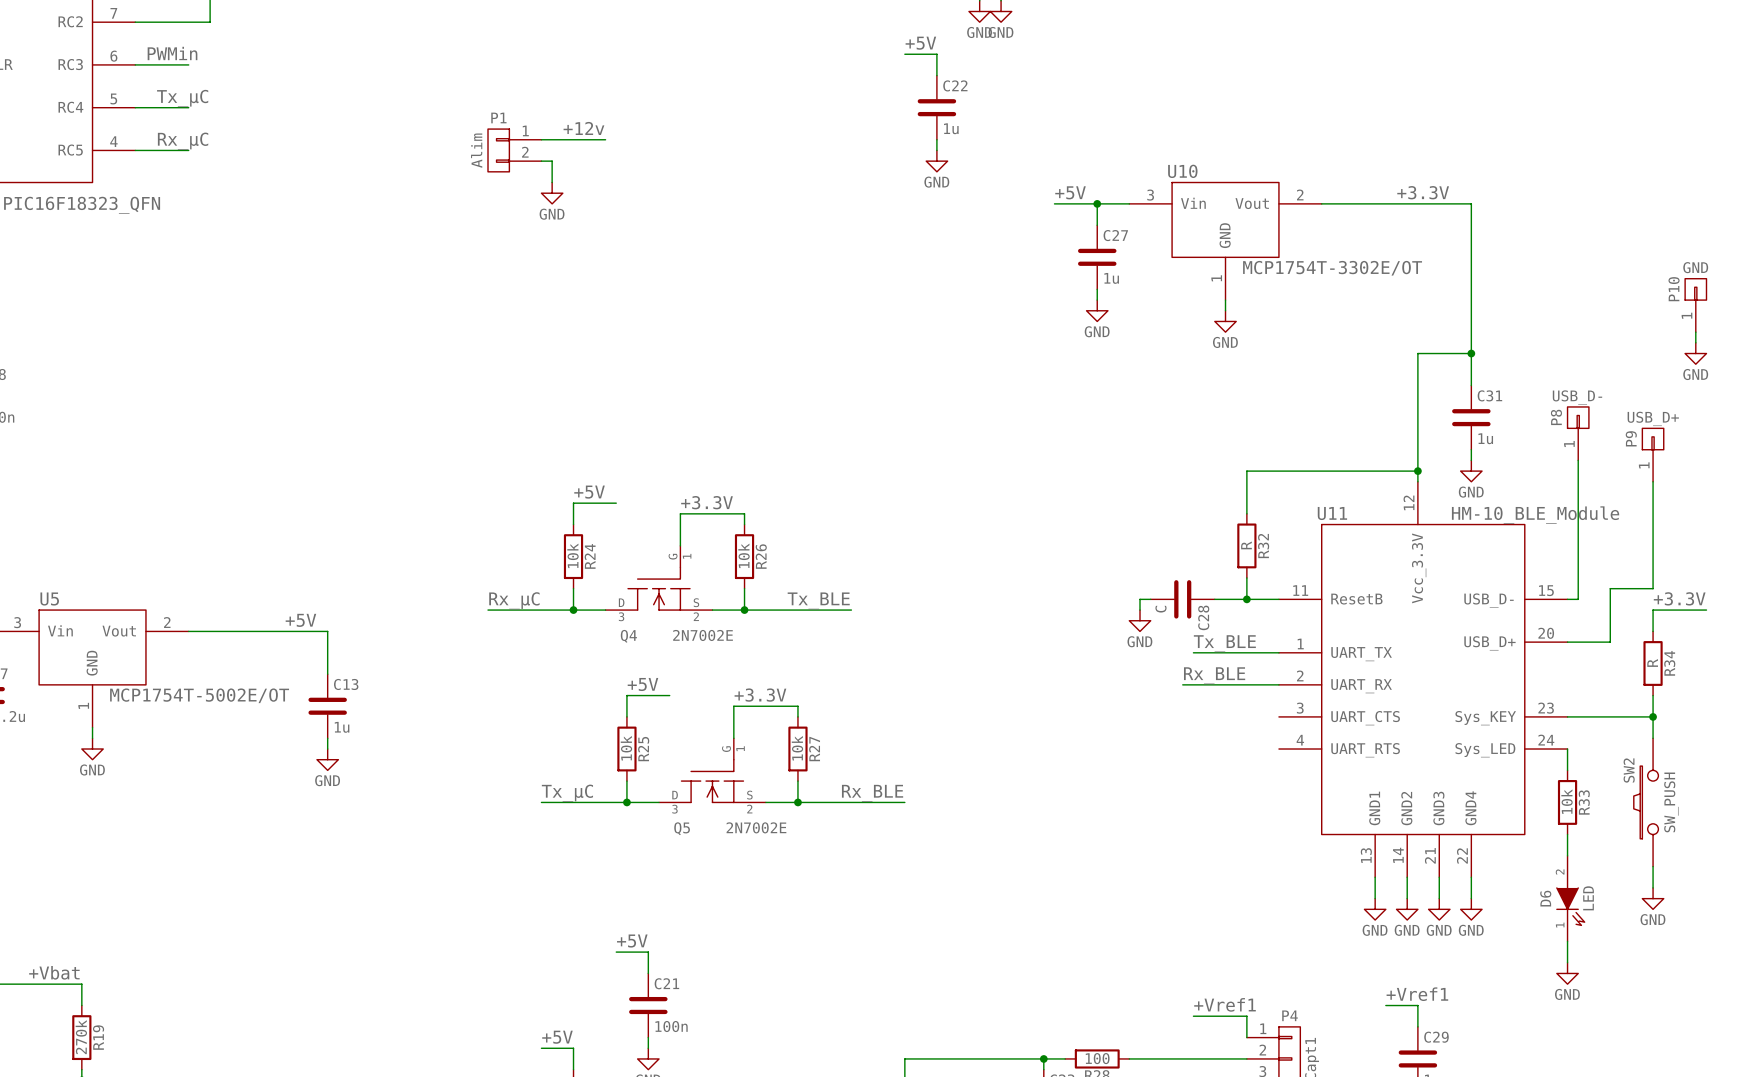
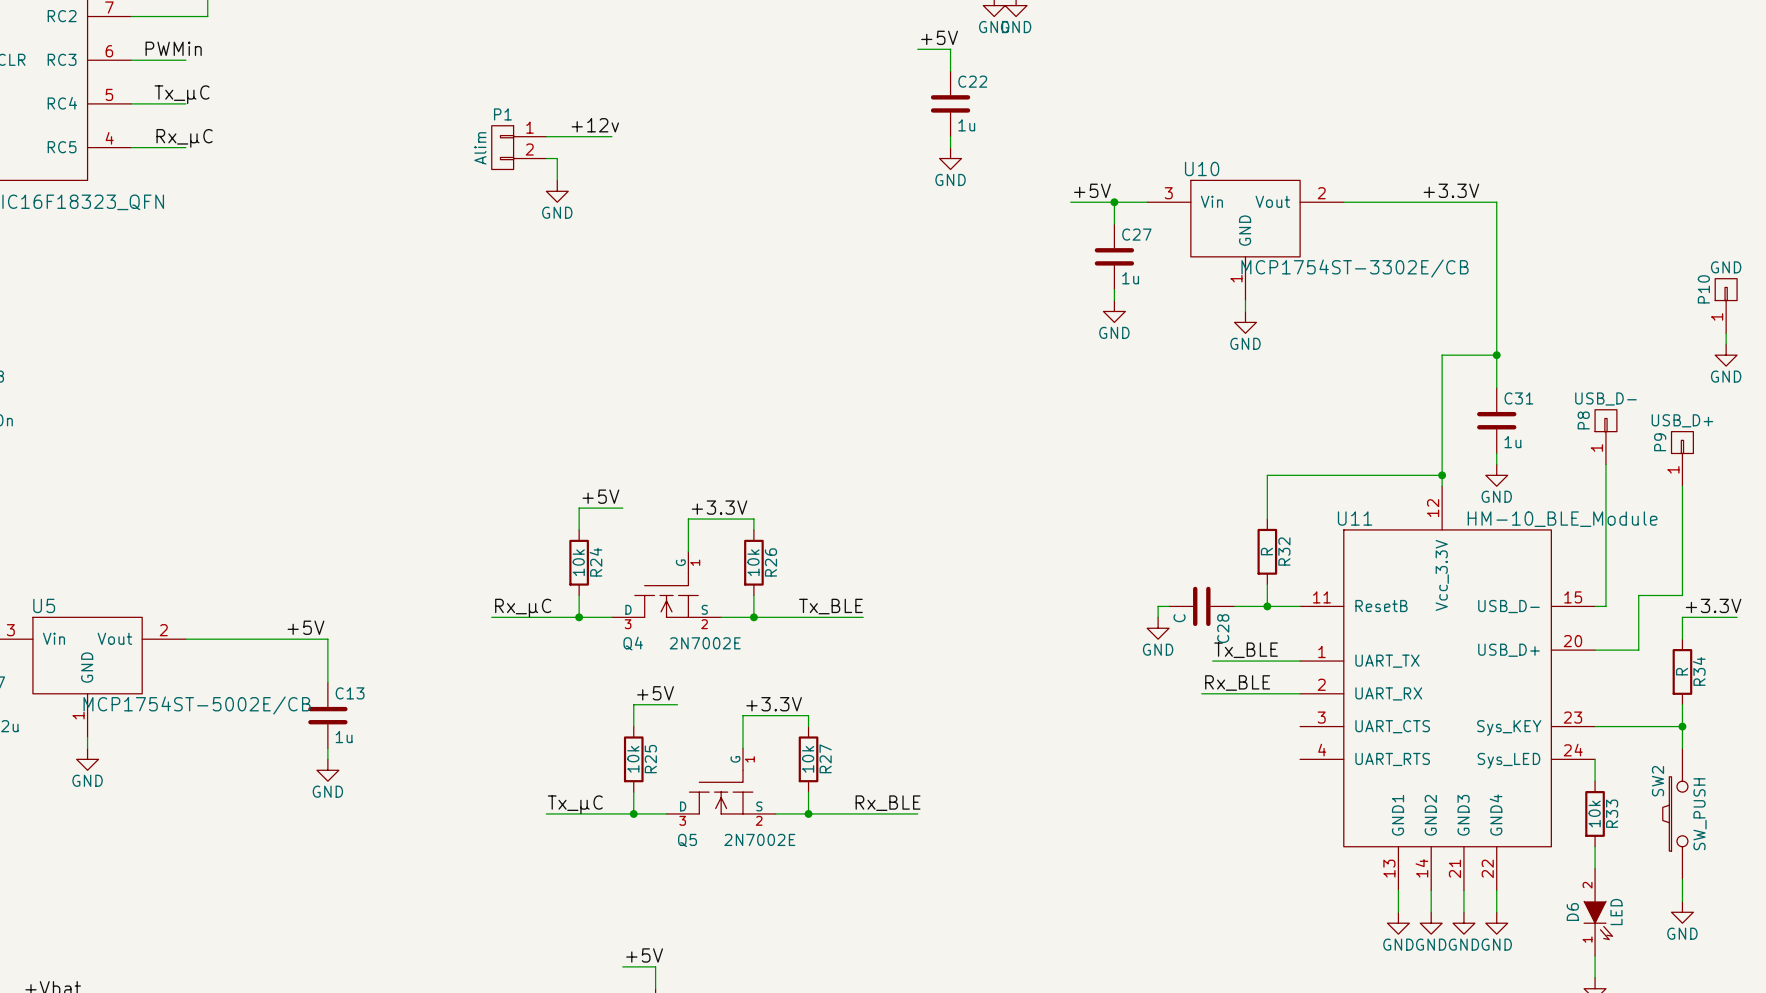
U10 value: MCP1754T-3302E/OT (1332, 268) -> MCP1754ST-3302E/CB (1355, 268)
U5 value: MCP1754T-5002E/OT (199, 695) -> MCP1754ST-5002E/CB (197, 705)

